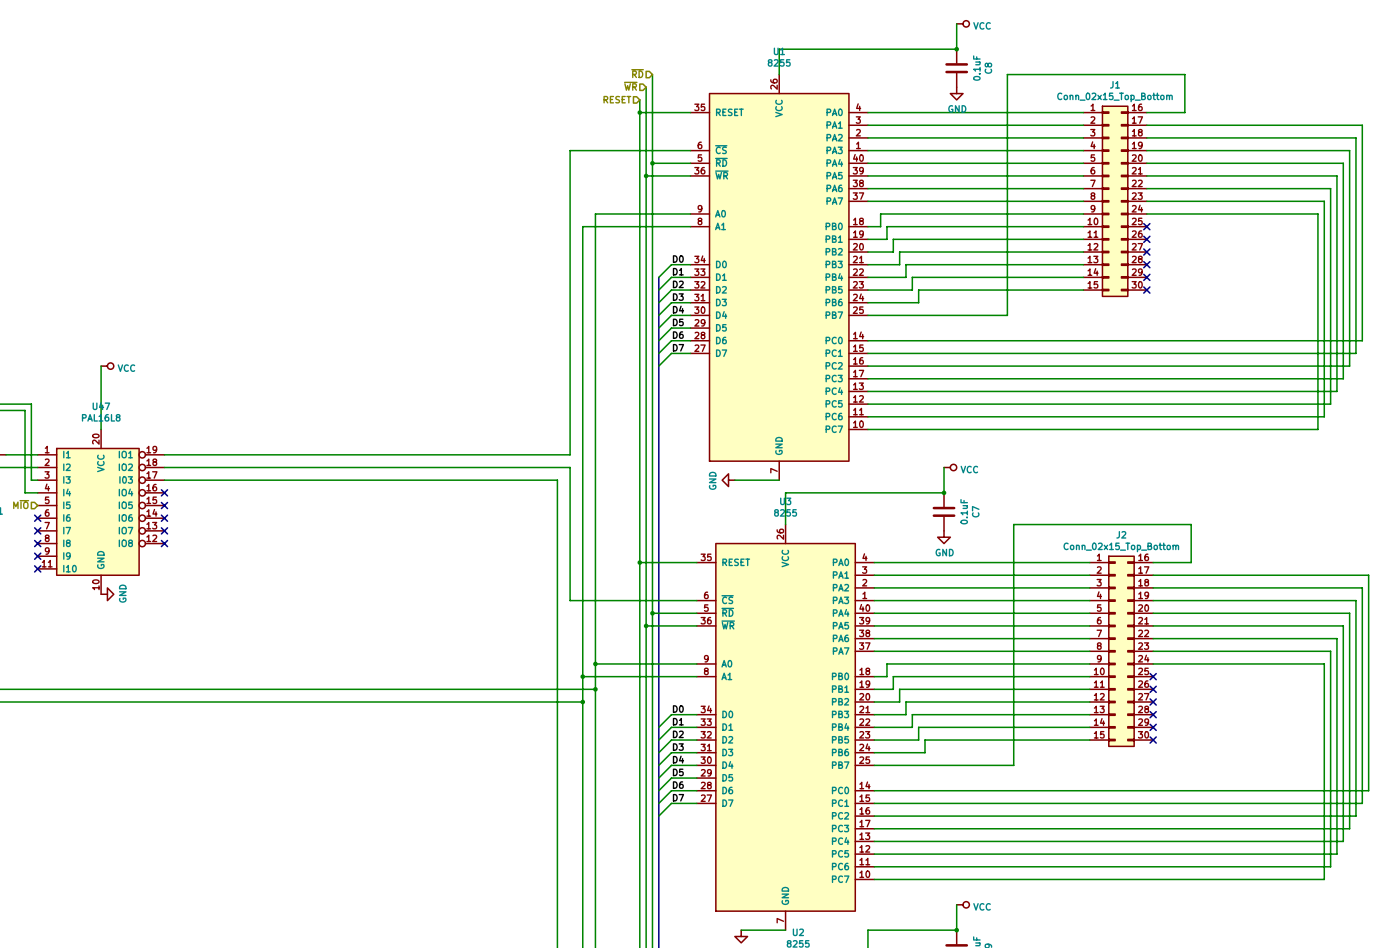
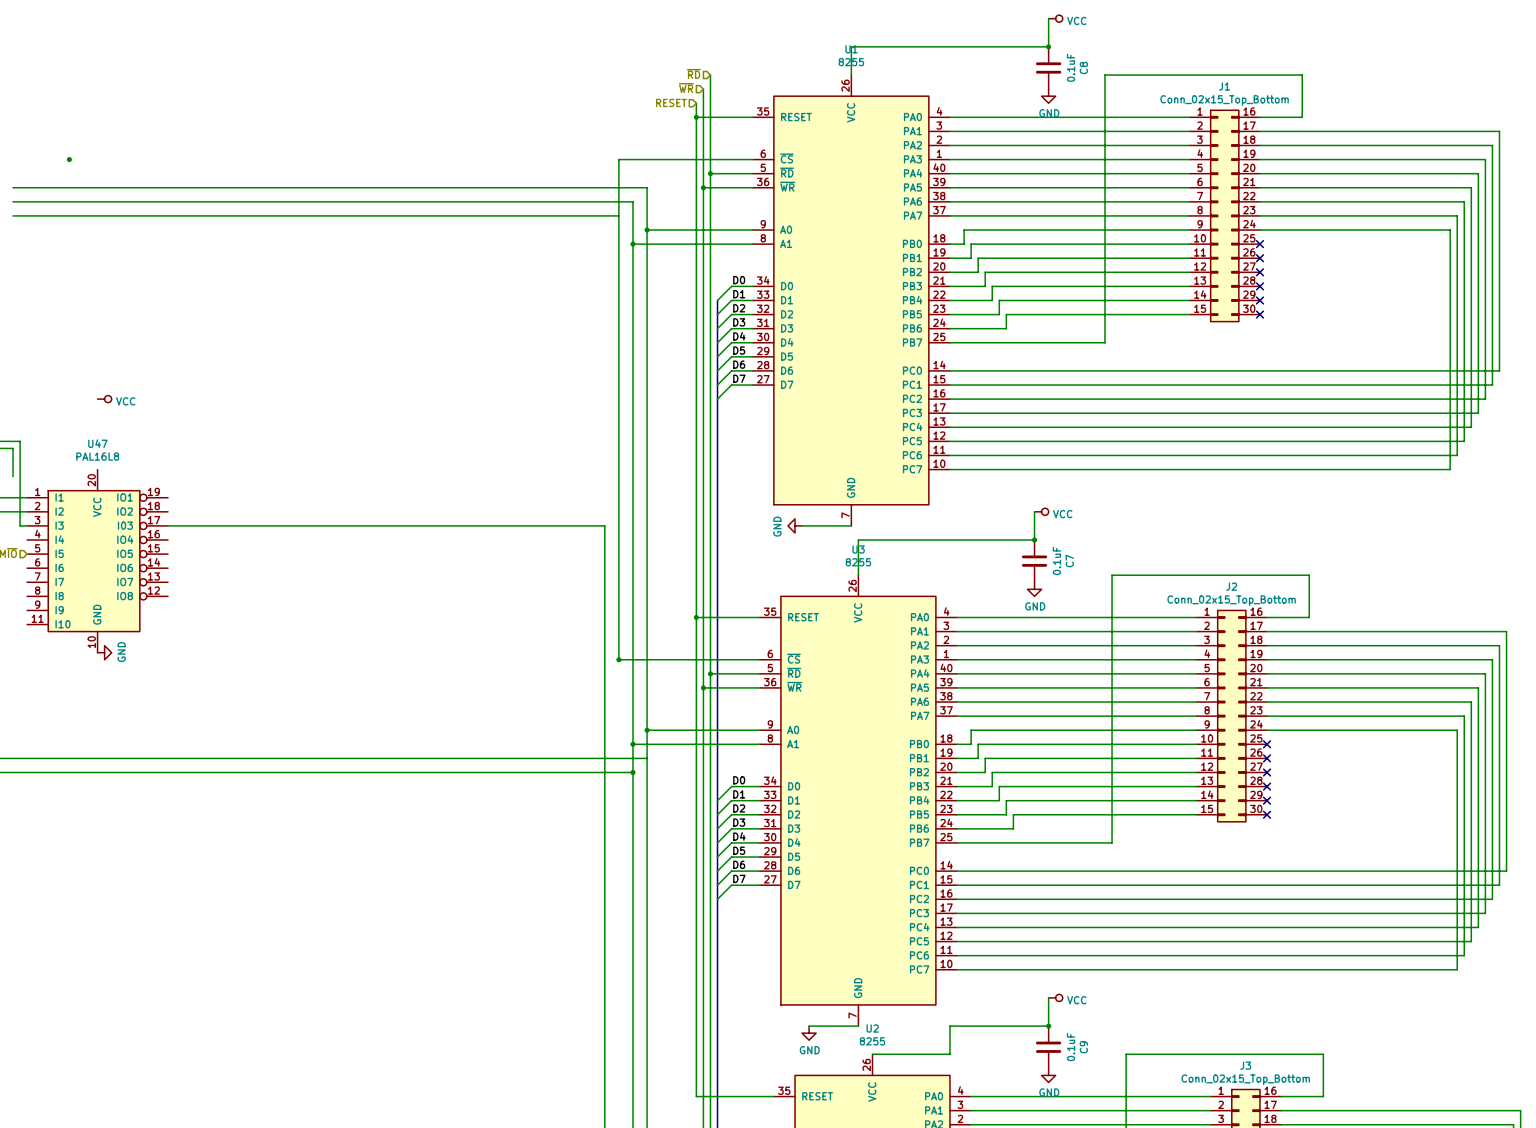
junction: none -> (69, 159)
wire: none -> (13, 187) (647, 187) (647, 230)
wire: none -> (13, 201) (632, 201) (632, 244)
wire: none -> (13, 215) (618, 215)
junction: none -> (647, 230)
junction: none -> (632, 244)
wire: (101, 366) (101, 429) -> none
wire: (25, 435) (25, 492) (37, 492) -> none
wire: (164, 454) (570, 454) -> (618, 511) (618, 497)
wire: (164, 467) (570, 467) -> none
no-connect mark: (164, 492) -> none
no-connect mark: (164, 505) -> none
no-connect mark: (37, 518) -> none
no-connect mark: (164, 518) -> none
no-connect mark: (37, 530) -> none
no-connect mark: (164, 530) -> none
no-connect mark: (37, 543) -> none
no-connect mark: (164, 543) -> none
no-connect mark: (37, 556) -> none
no-connect mark: (37, 568) -> none
junction: none -> (618, 659)
junction: (595, 689) -> none

